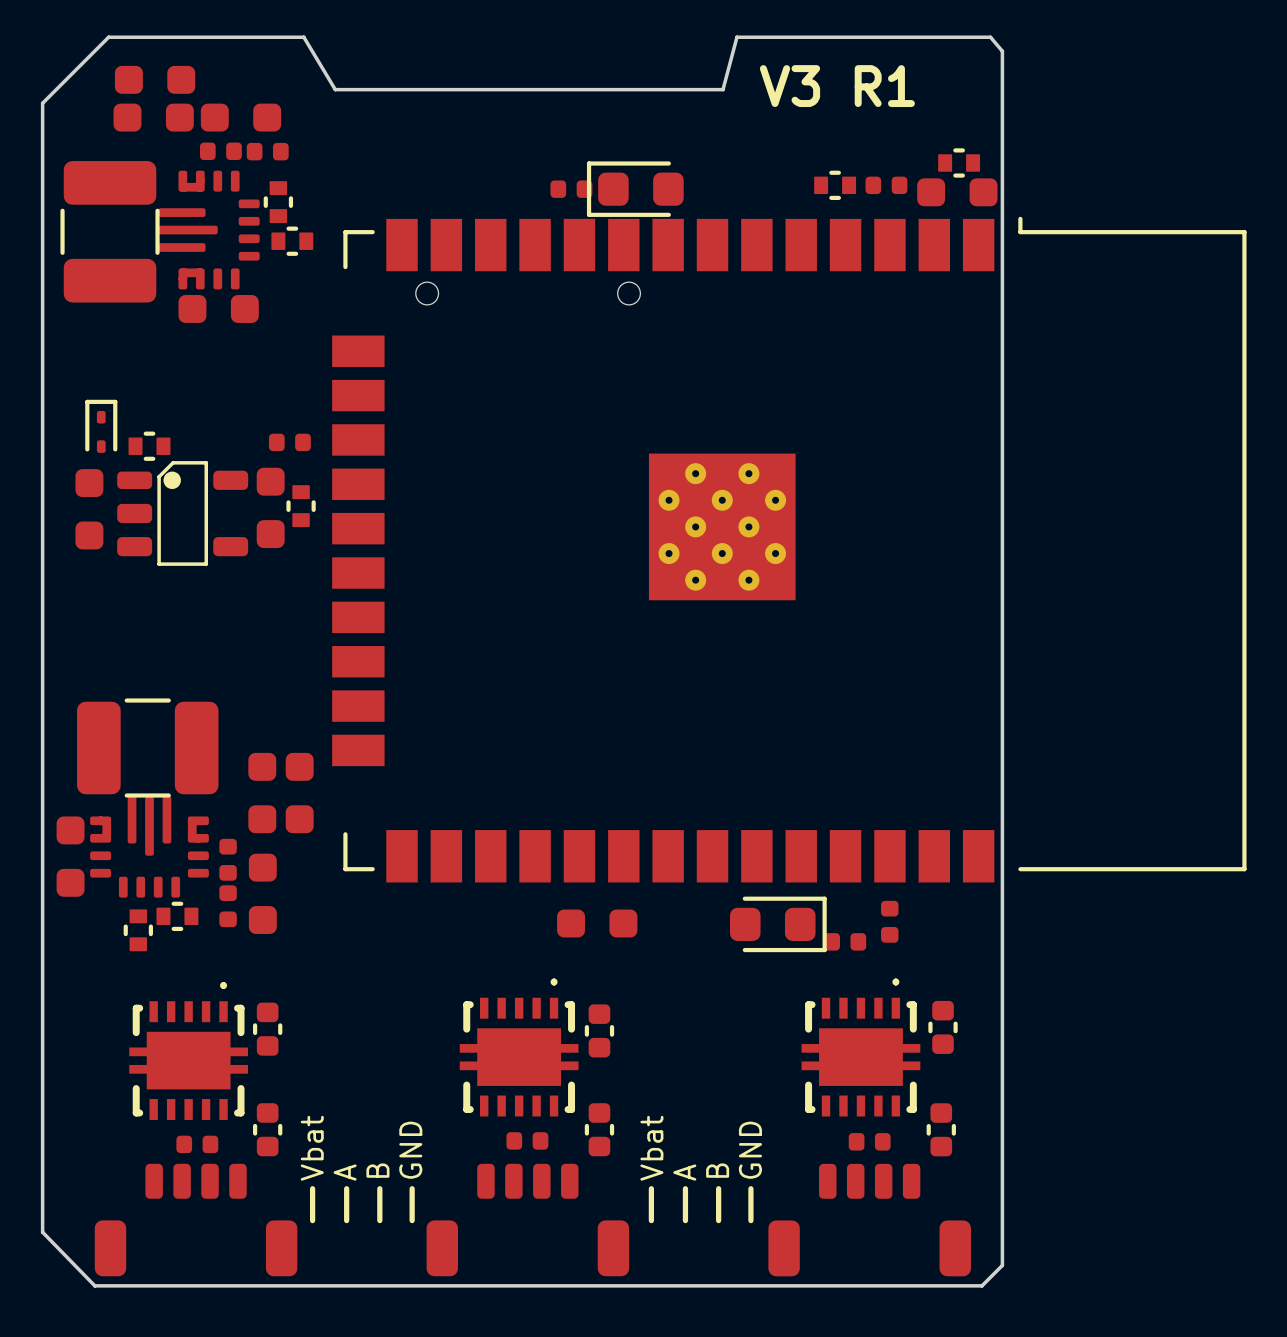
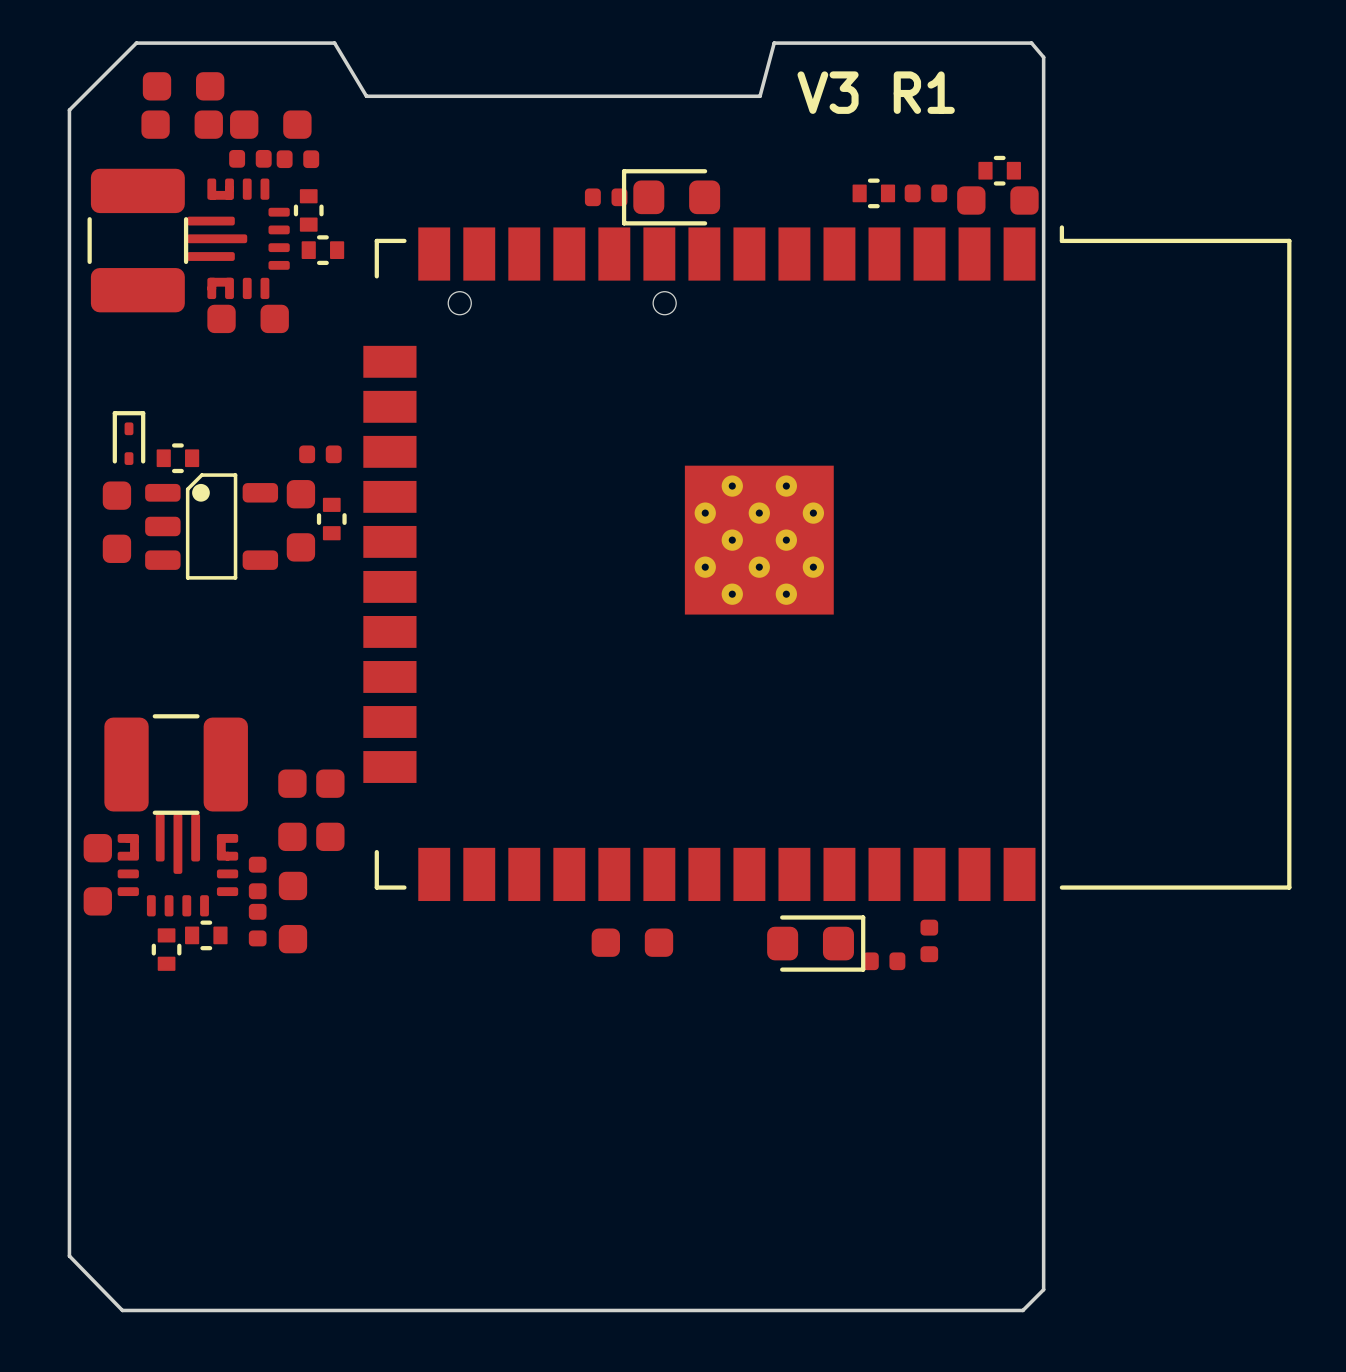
part: (943, 1027) -> none
part: (267, 1029) -> none
part: (599, 1030) -> none
part: (519, 1047) -> none
part: (860, 1047) -> none
part: (188, 1050) -> none
part: (267, 1129) -> none
part: (599, 1129) -> none
part: (941, 1129) -> none
part: (527, 1140) -> none
part: (869, 1141) -> none
part: (197, 1144) -> none
text: Vbat (312, 1148) -> none
text: Vbat (651, 1148) -> none
text: GND (410, 1150) -> none
text: GND (750, 1150) -> none
text: B (377, 1170) -> none
text: B (717, 1170) -> none
text: A (345, 1172) -> none
text: A (684, 1172) -> none
line: (312, 1188) (312, 1220) -> none
line: (346, 1188) (346, 1220) -> none
line: (379, 1188) (379, 1220) -> none
line: (412, 1188) (412, 1220) -> none
line: (651, 1188) (651, 1220) -> none
line: (685, 1188) (685, 1220) -> none
line: (718, 1188) (718, 1220) -> none
line: (750, 1188) (750, 1220) -> none
part: (196, 1220) -> none
part: (527, 1220) -> none
part: (869, 1220) -> none

